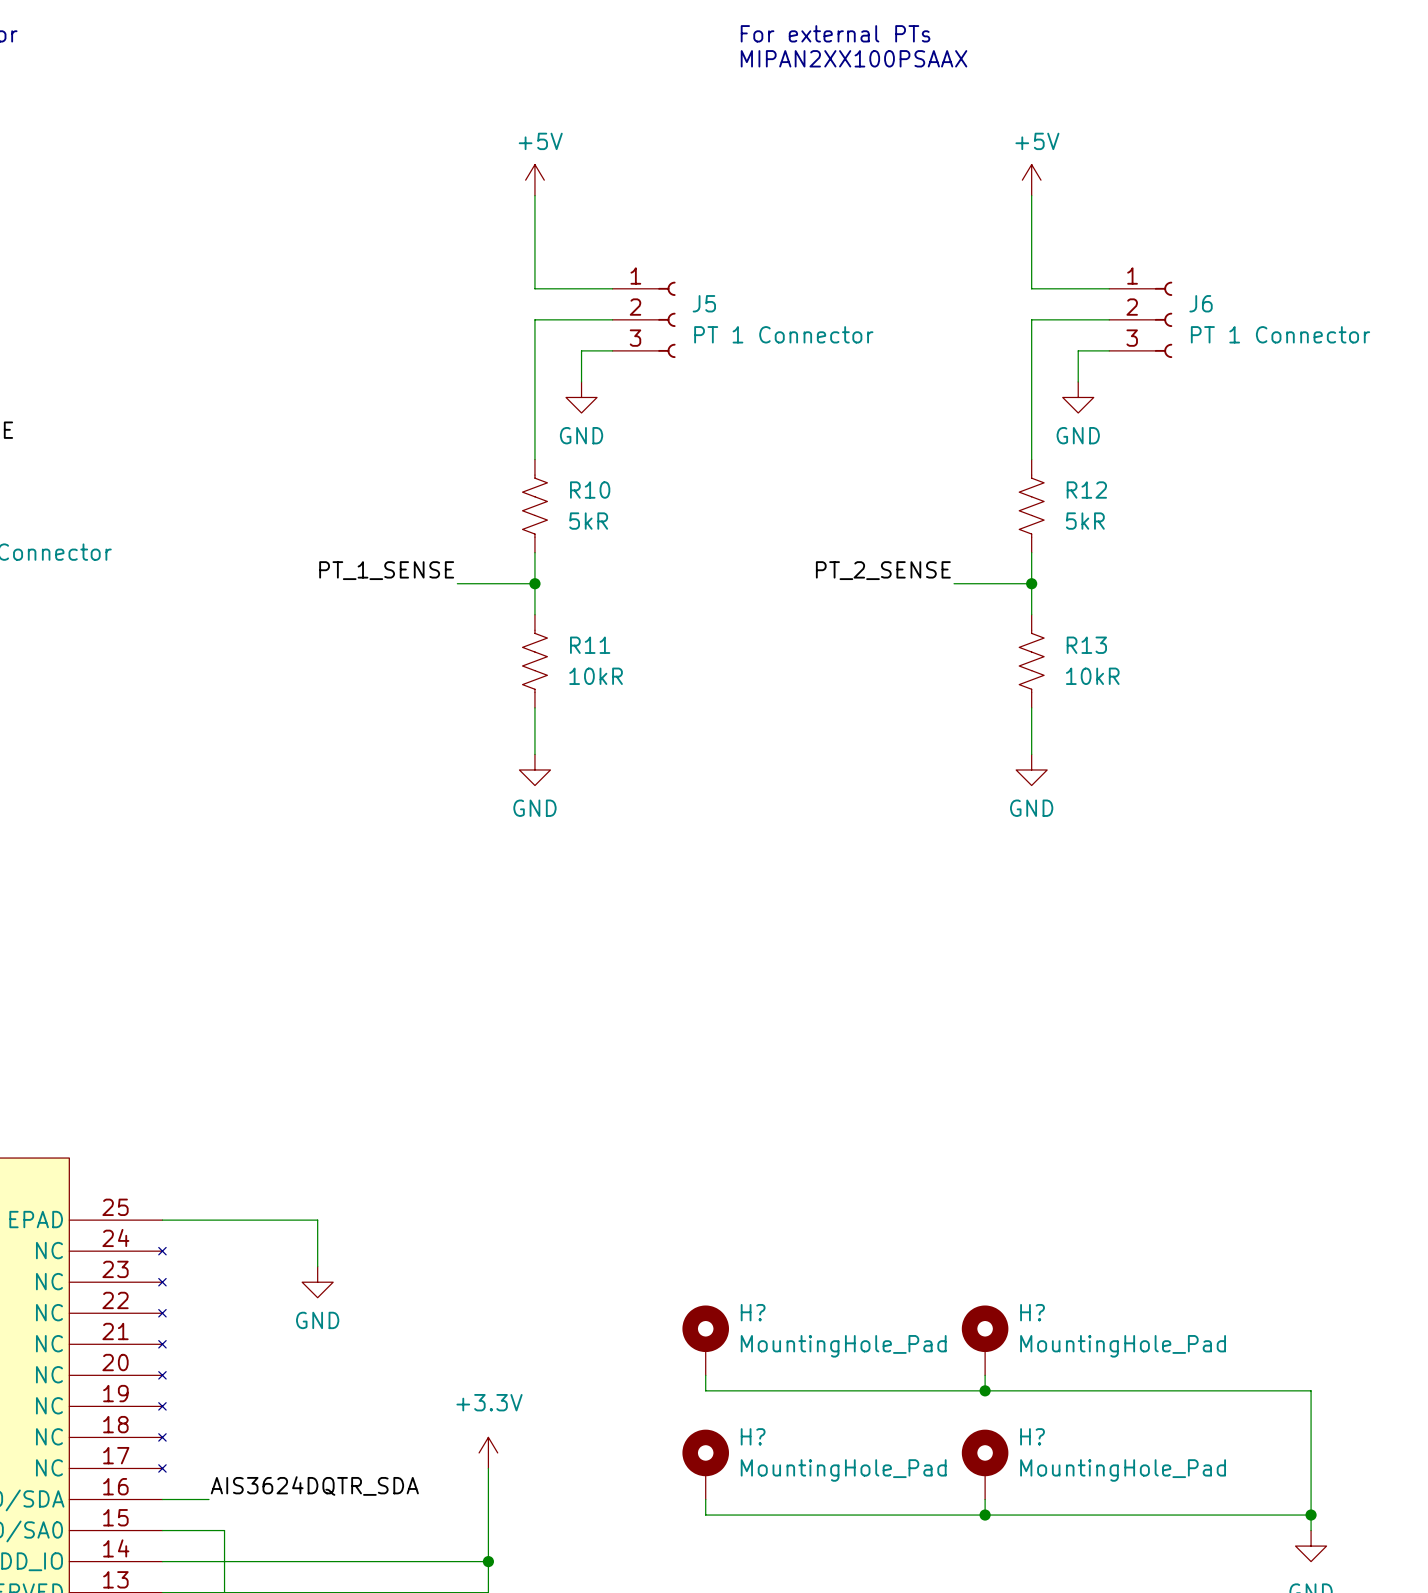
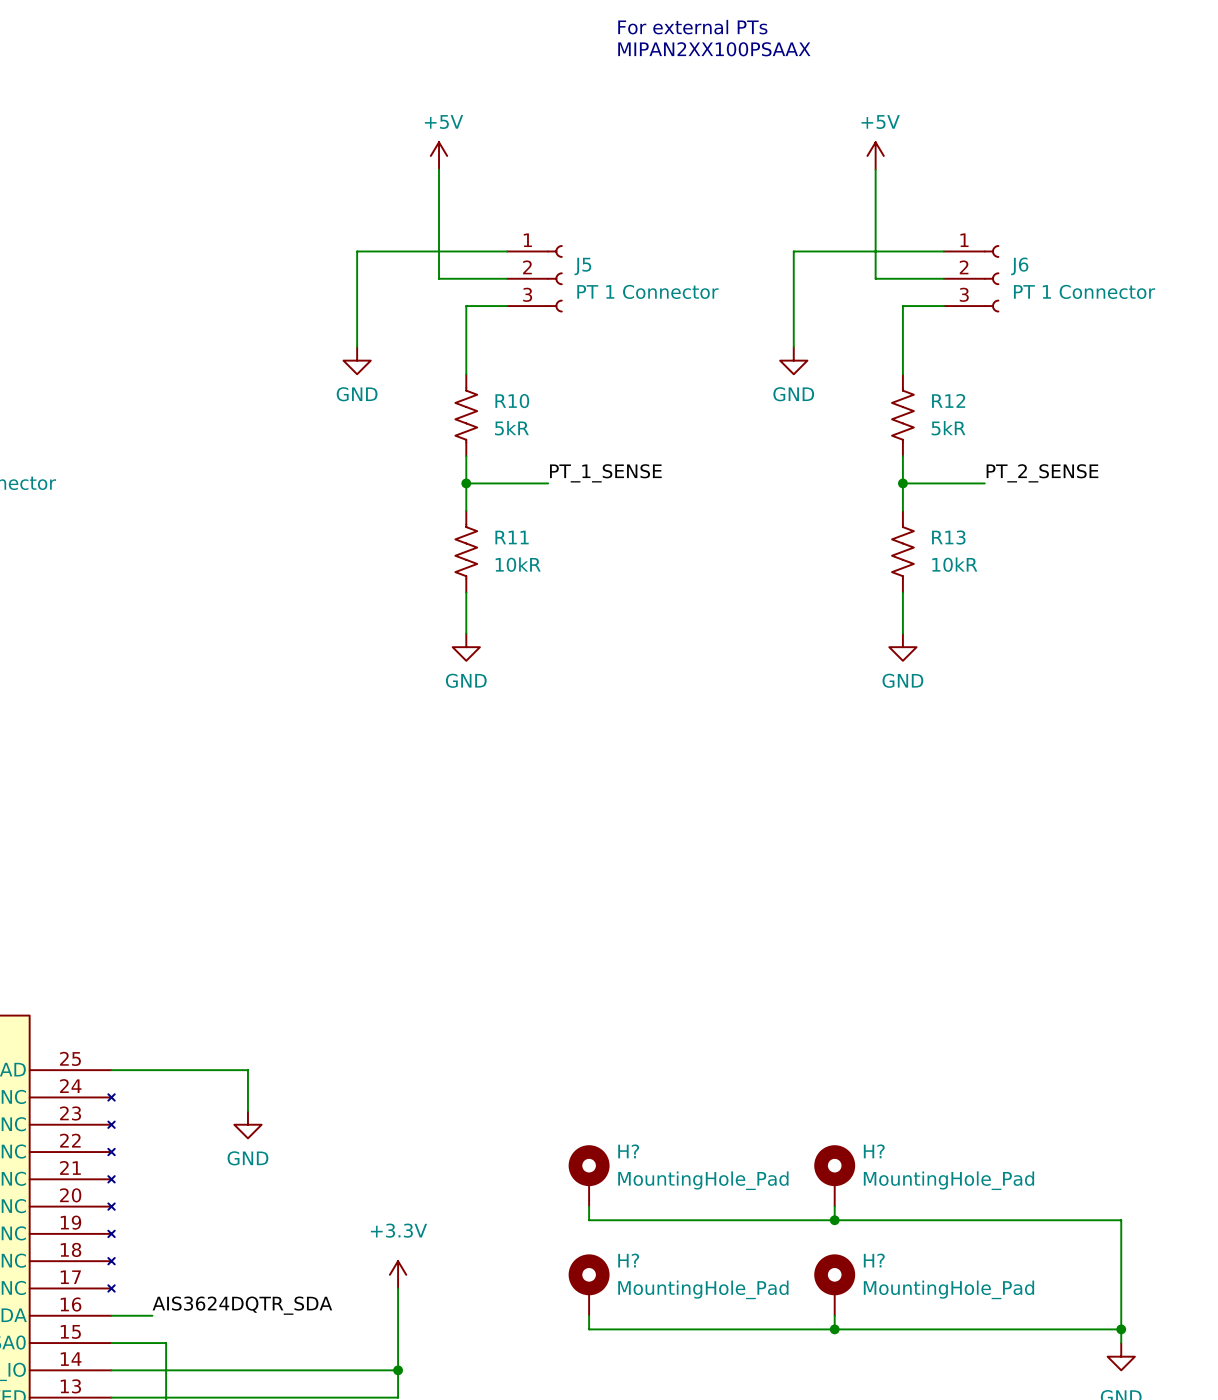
wire: (534, 319) (534, 459) -> (439, 278) (439, 251) (357, 251) (357, 346)
wire: (1031, 319) (1031, 459) -> (875, 278) (875, 251) (793, 251) (793, 346)
wire: (581, 350) (581, 381) -> (479, 306) (466, 306) (466, 374)
wire: (1078, 350) (1078, 381) -> (916, 306) (902, 306) (902, 374)
power symbol position: GND (581, 397) -> GND (357, 360)
power symbol position: GND (1078, 397) -> GND (793, 360)
R10 position: (534, 506) -> (466, 415)
R12 position: (1031, 506) -> (902, 415)
wire: (534, 552) (534, 614) -> (466, 456) (466, 510)
wire: none -> (466, 483) (548, 483)
wire: (1031, 552) (1031, 614) -> (902, 456) (902, 510)
wire: none -> (902, 483) (984, 483)
label position: PT_1_SENSE (386, 570) -> PT_1_SENSE (605, 473)
label position: PT_2_SENSE (883, 570) -> PT_2_SENSE (1042, 473)
wire: (457, 583) (534, 583) -> none
junction position: (534, 583) -> (466, 483)
wire: (954, 583) (1031, 583) -> none
junction position: (1031, 583) -> (902, 483)
R11 position: (534, 661) -> (466, 551)
R13 position: (1031, 661) -> (902, 551)
wire: (534, 707) (534, 754) -> (466, 592) (466, 633)
wire: (1031, 707) (1031, 754) -> (902, 592) (902, 633)
power symbol position: GND (534, 769) -> GND (466, 647)
power symbol position: GND (1031, 769) -> GND (902, 647)

